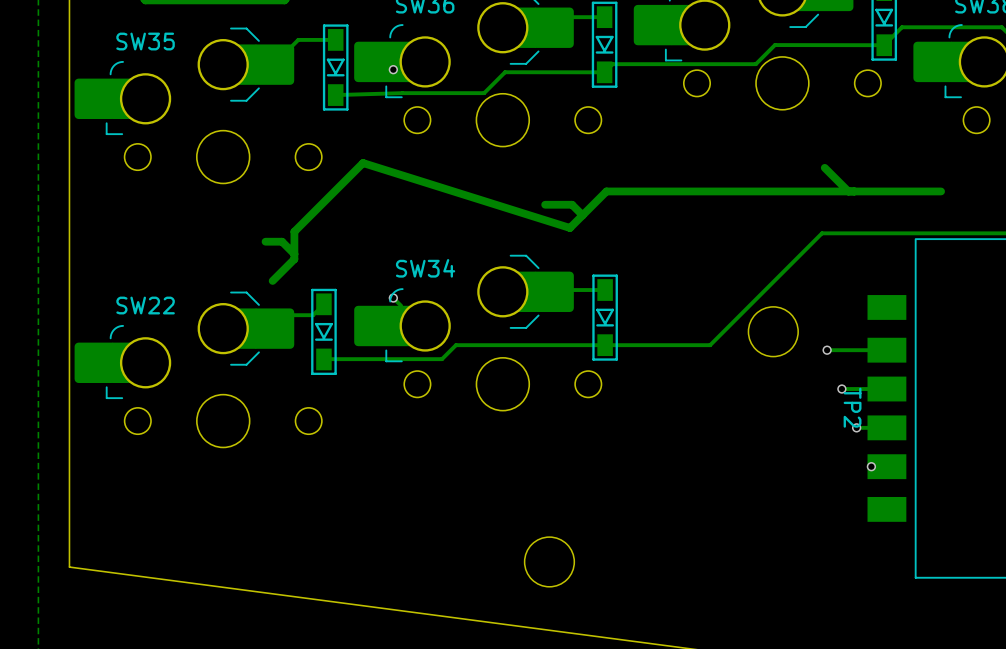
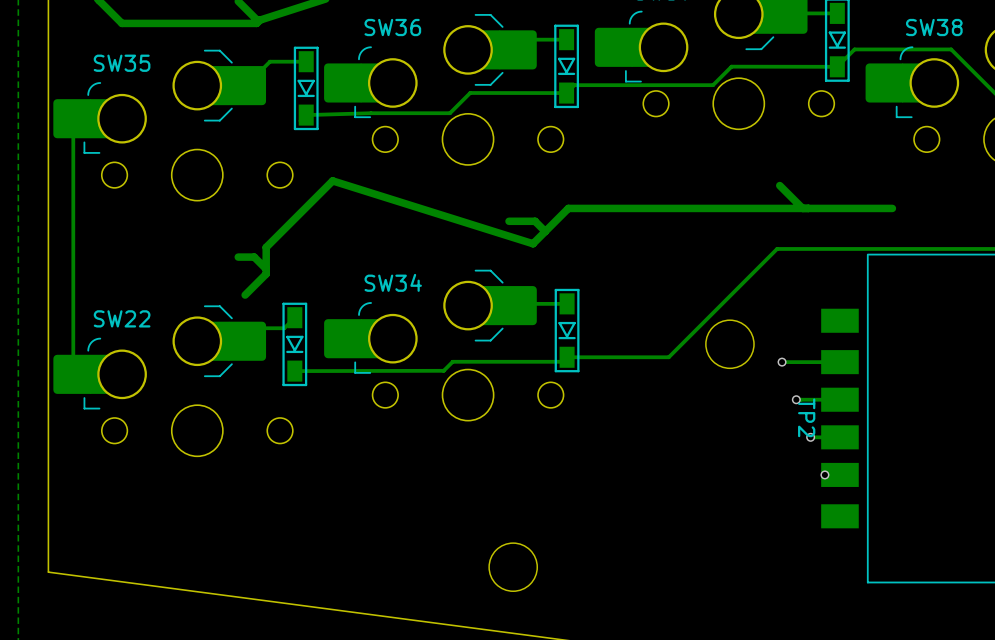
via: (393, 69) -> none
track: none -> (73, 136) (73, 374)
track: (393, 298) (401, 305) -> none
via: (393, 298) -> none
track: (605, 345) (455, 345) (442, 359) (330, 359) -> none
track: none -> (561, 361) (452, 361) (443, 370) (294, 371)

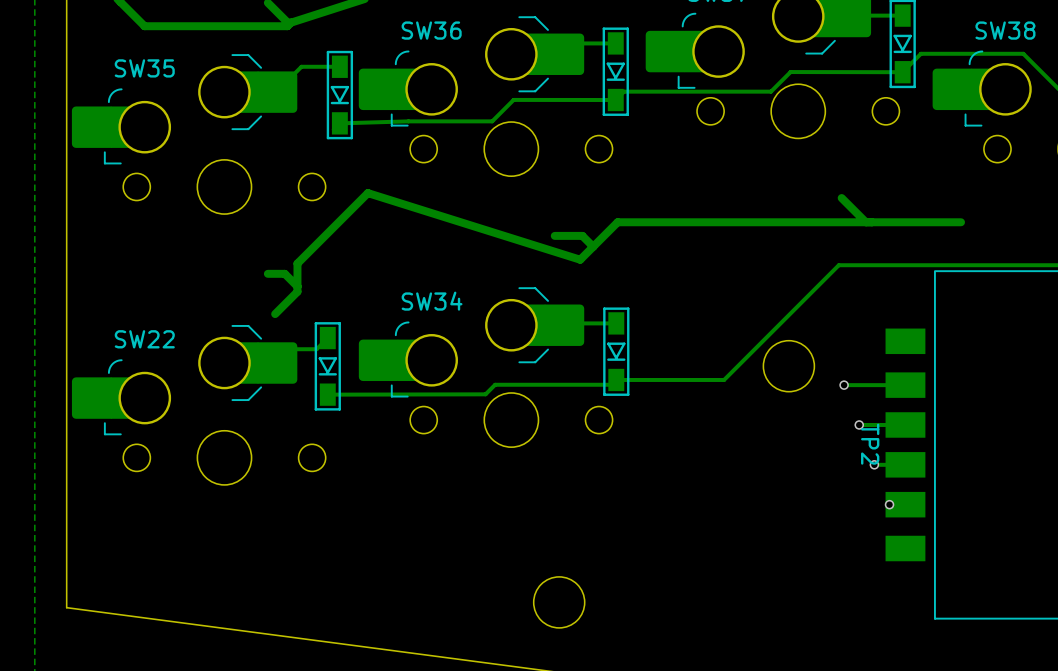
track: (73, 136) (73, 374) -> none

